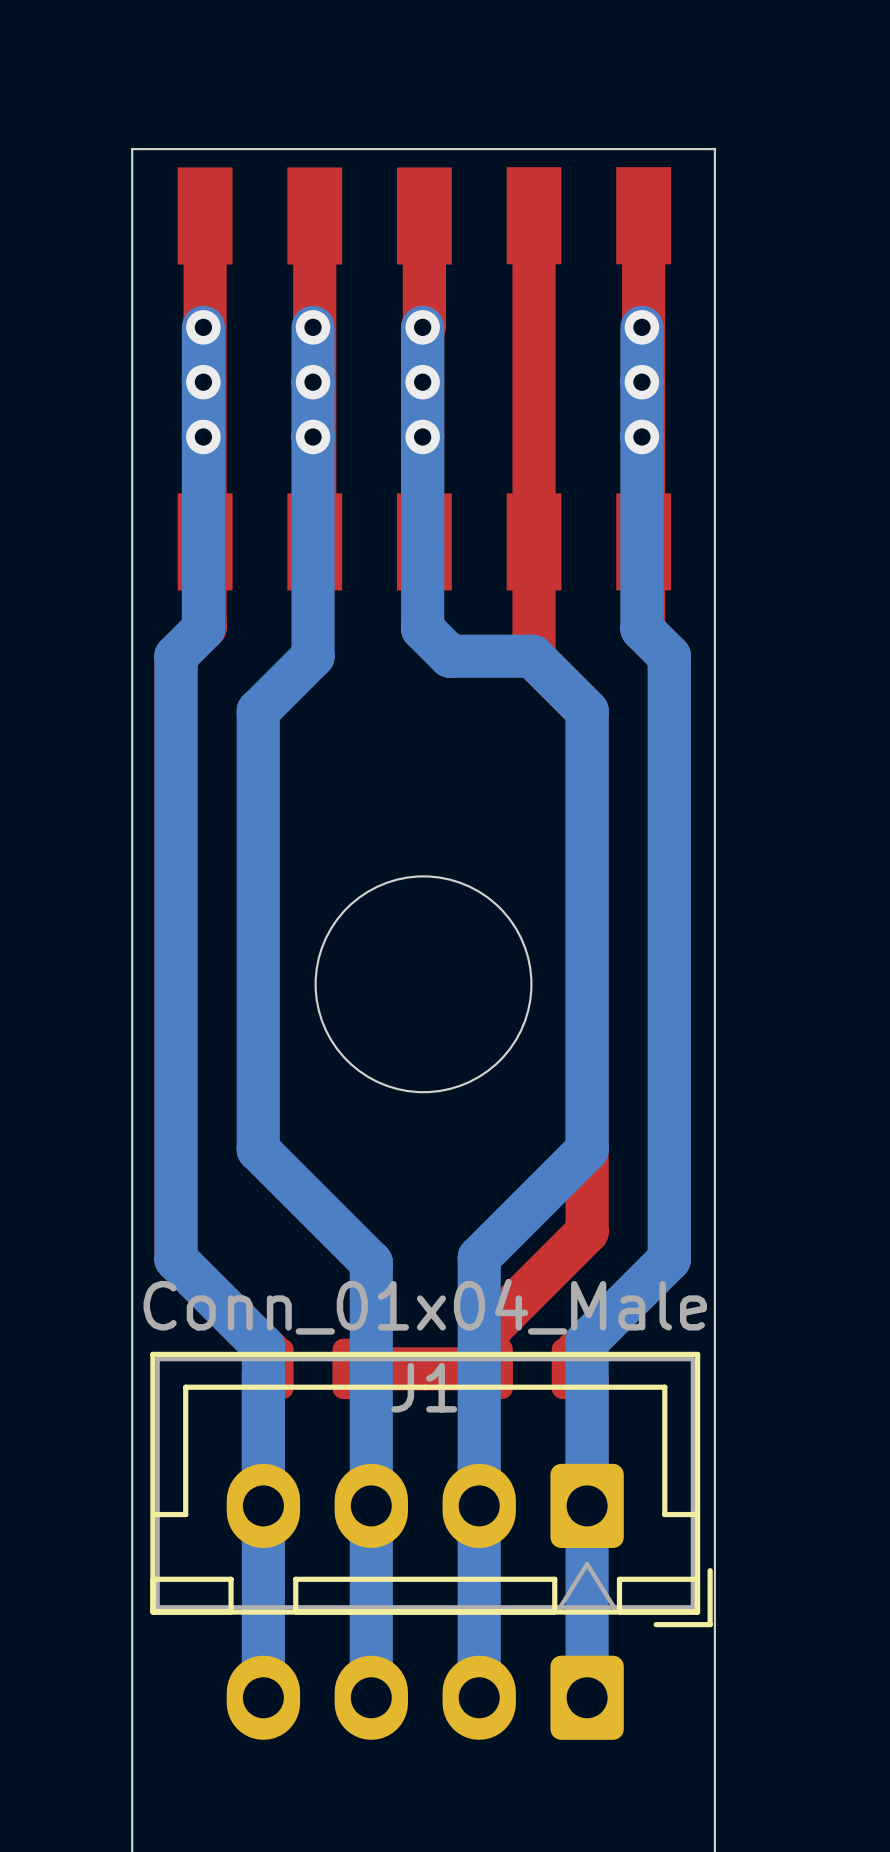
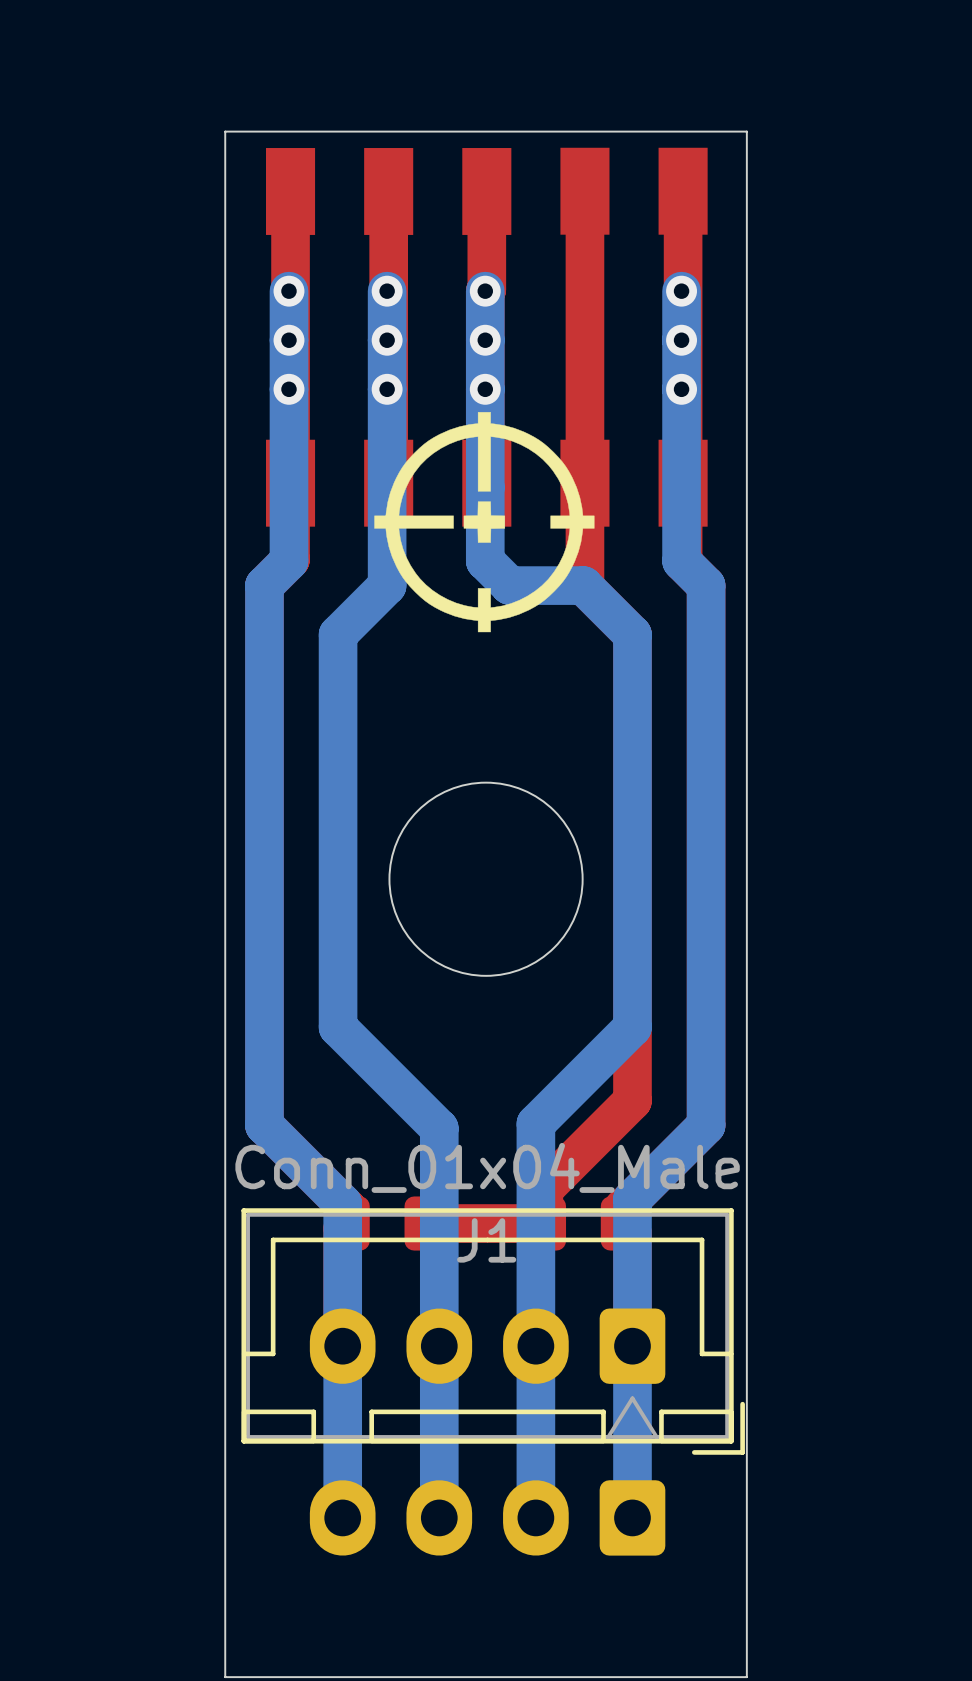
drawing: none -> [374, 412, 595, 633]

